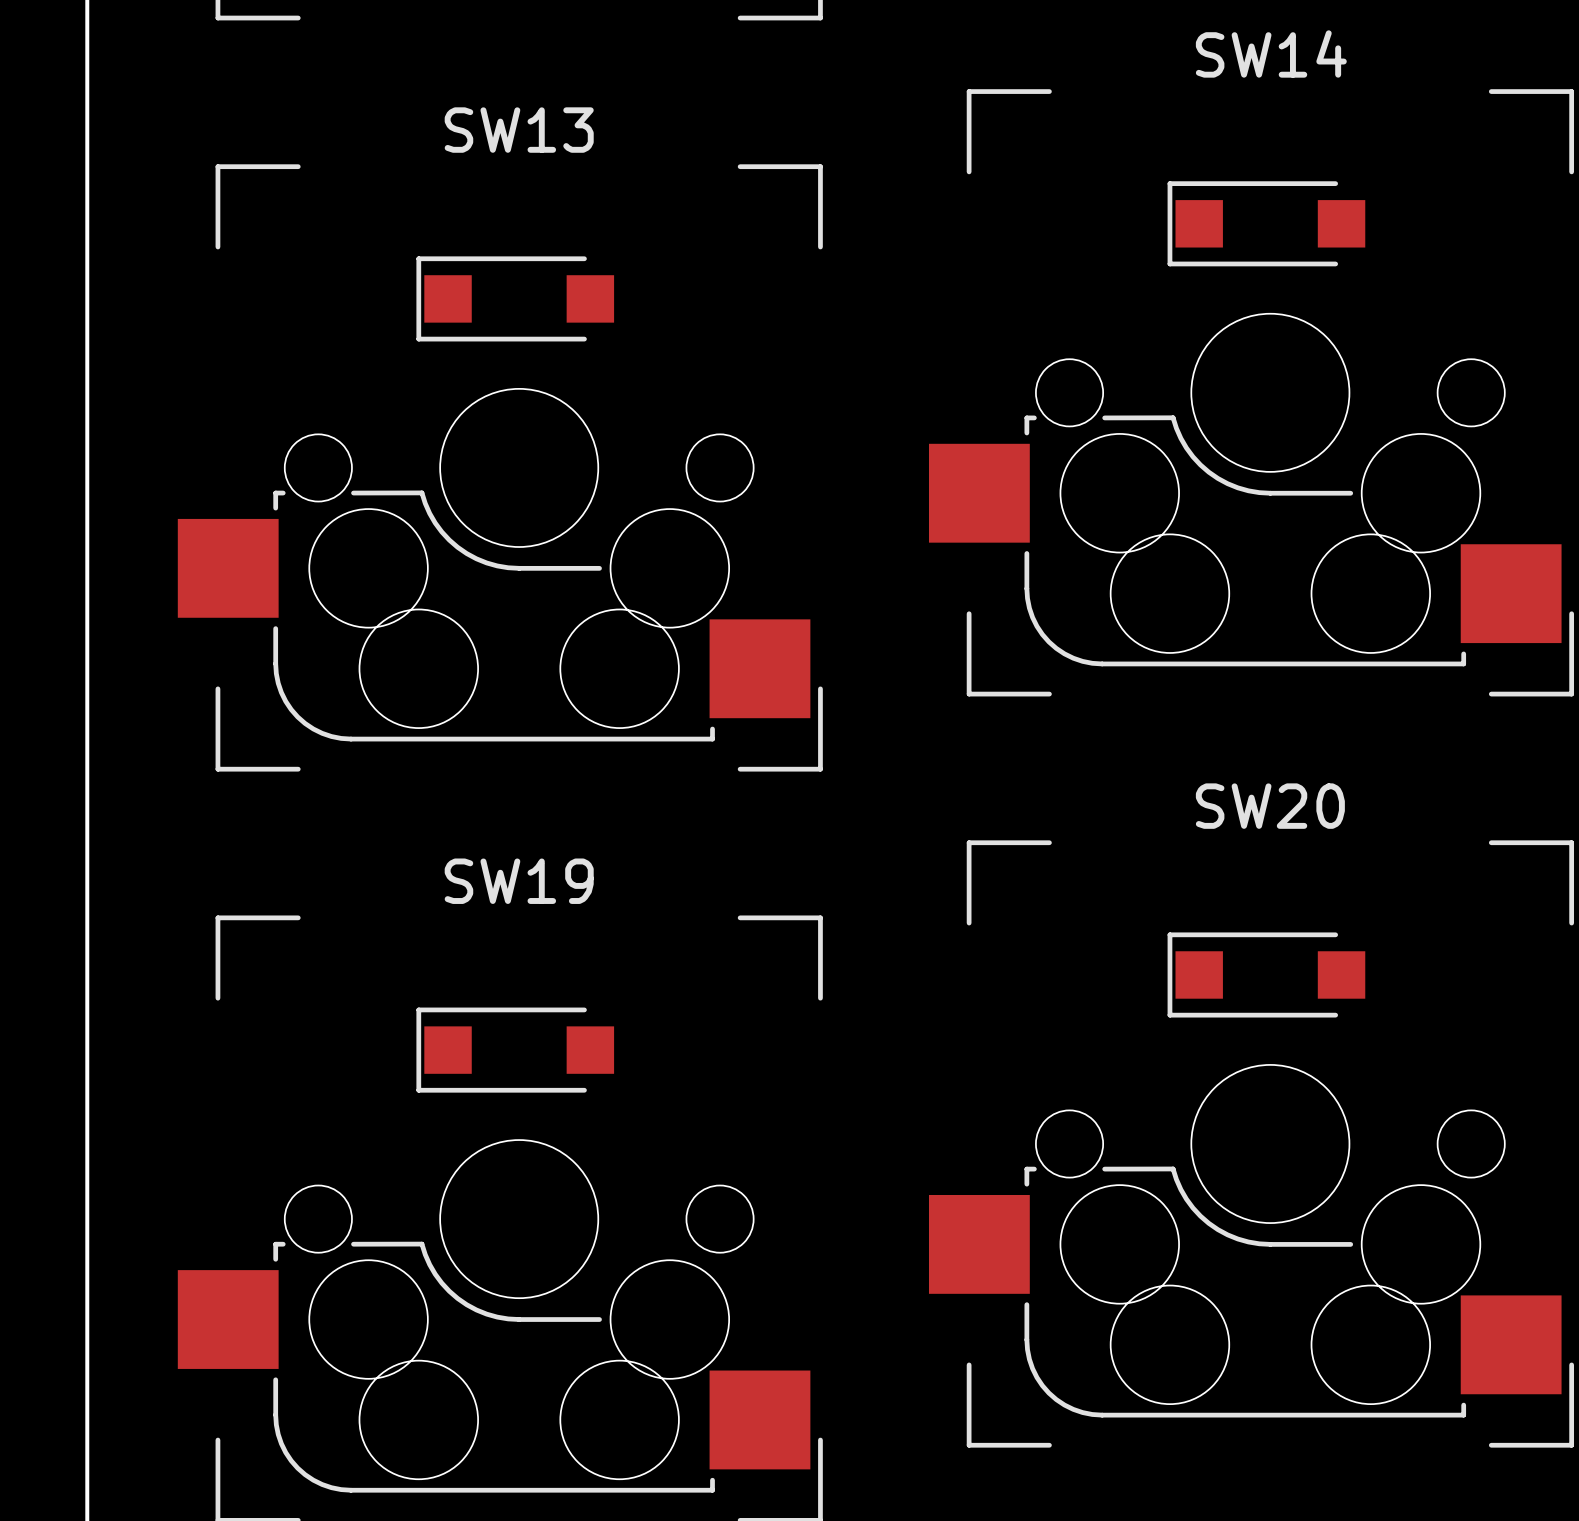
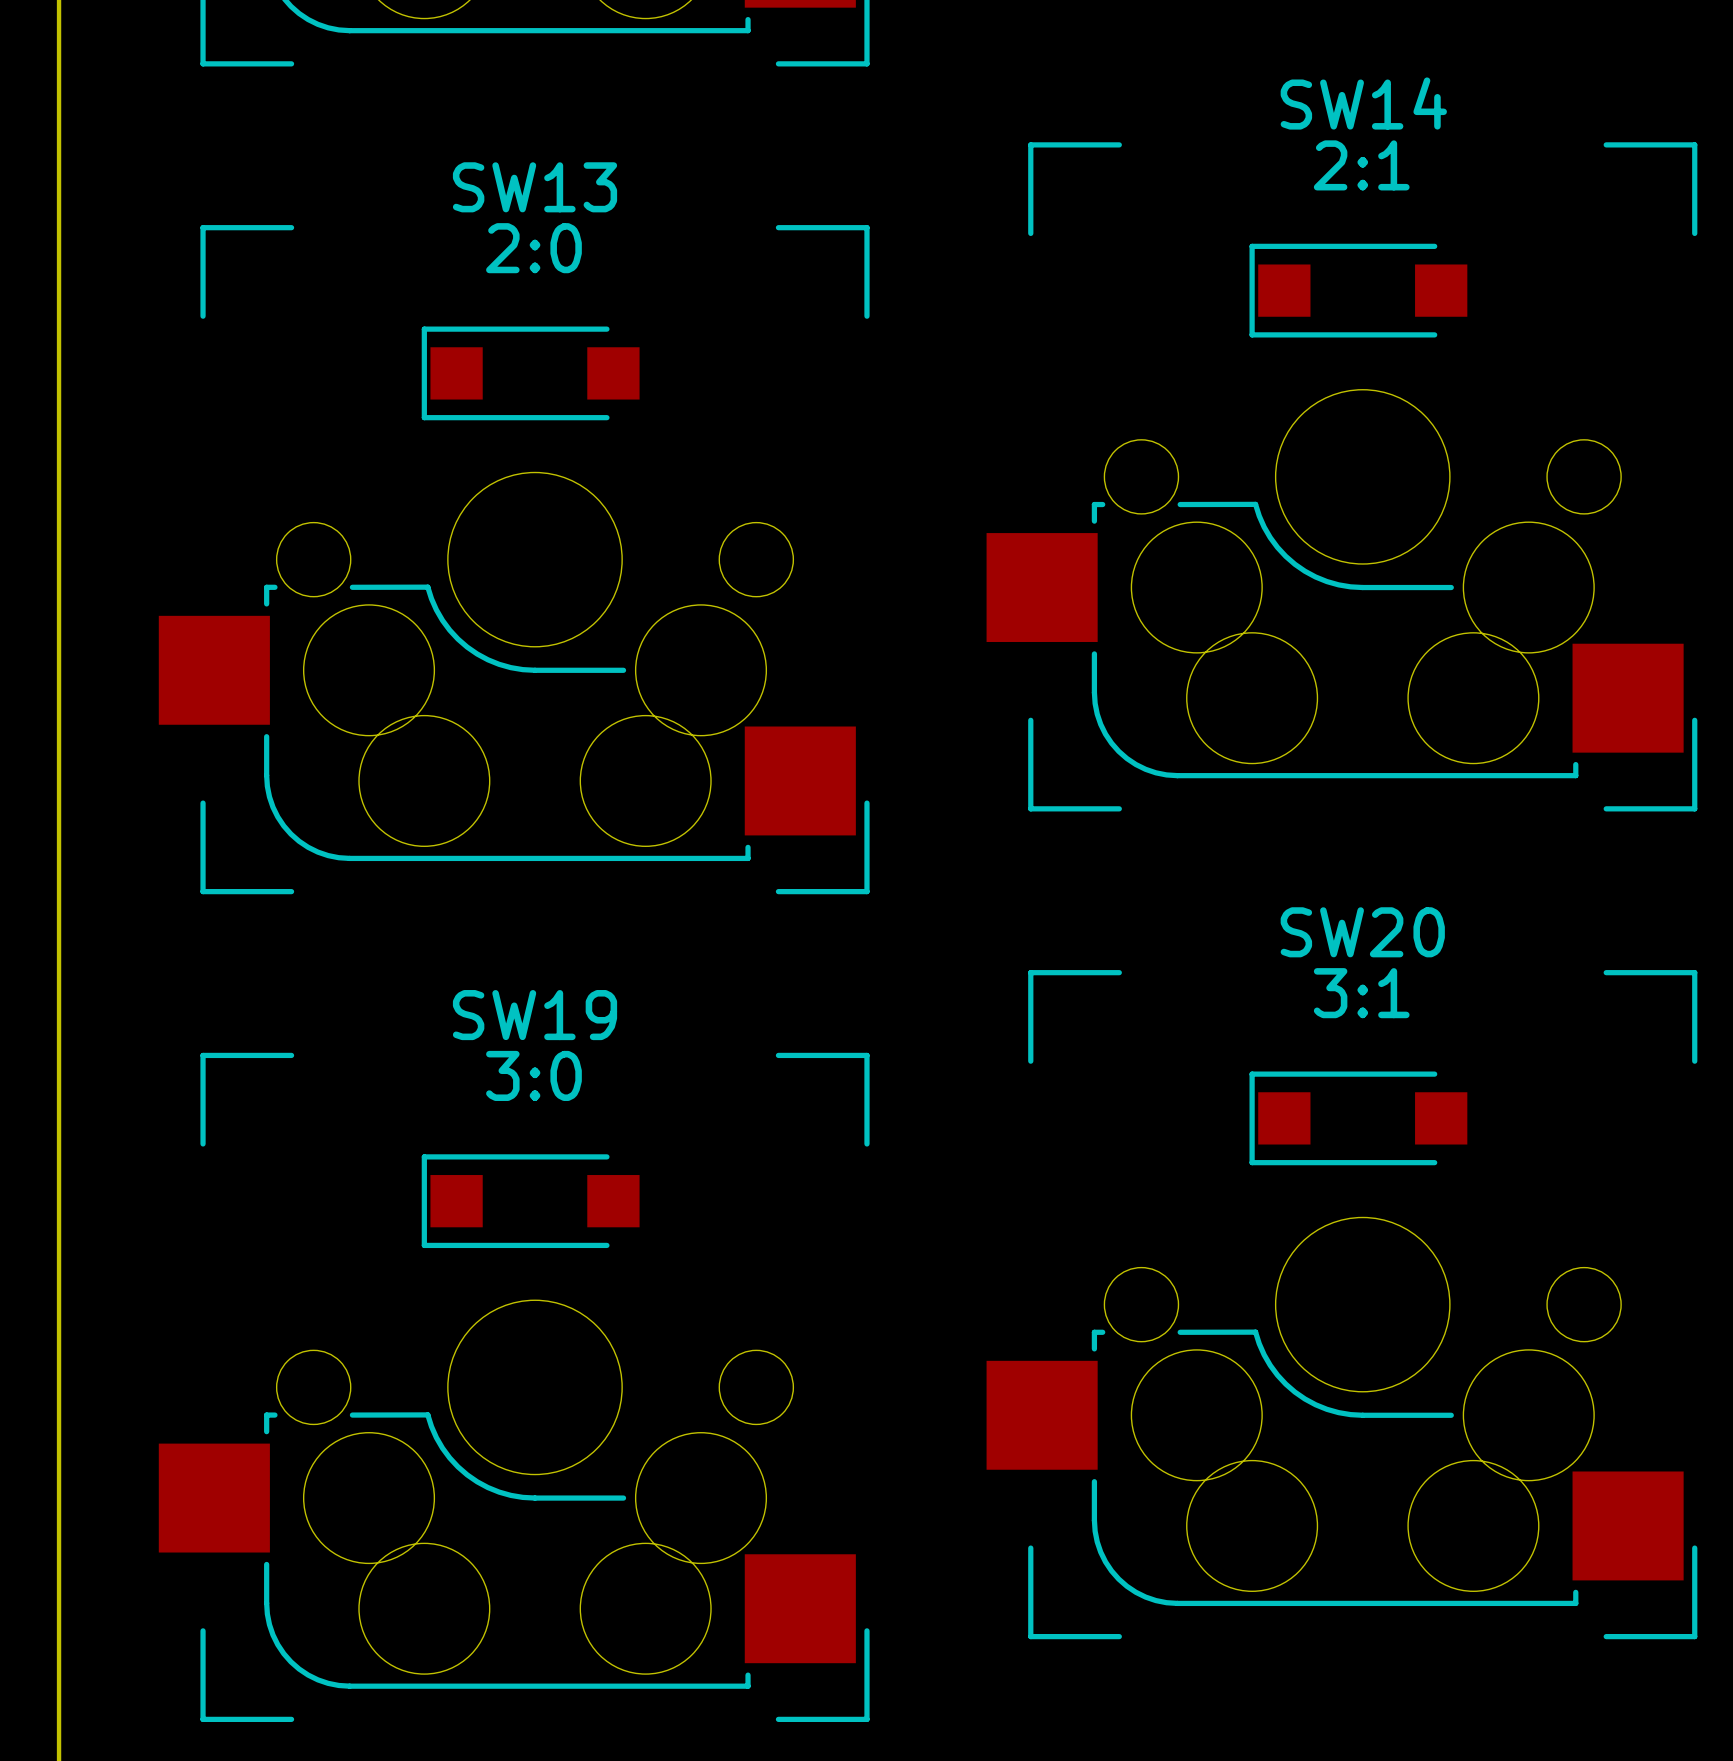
SW14 value: none -> 2:1 (1361, 165)
SW13 value: none -> 2:0 (533, 248)
SW20 value: none -> 3:1 (1361, 993)
SW19 value: none -> 3:0 (533, 1075)

